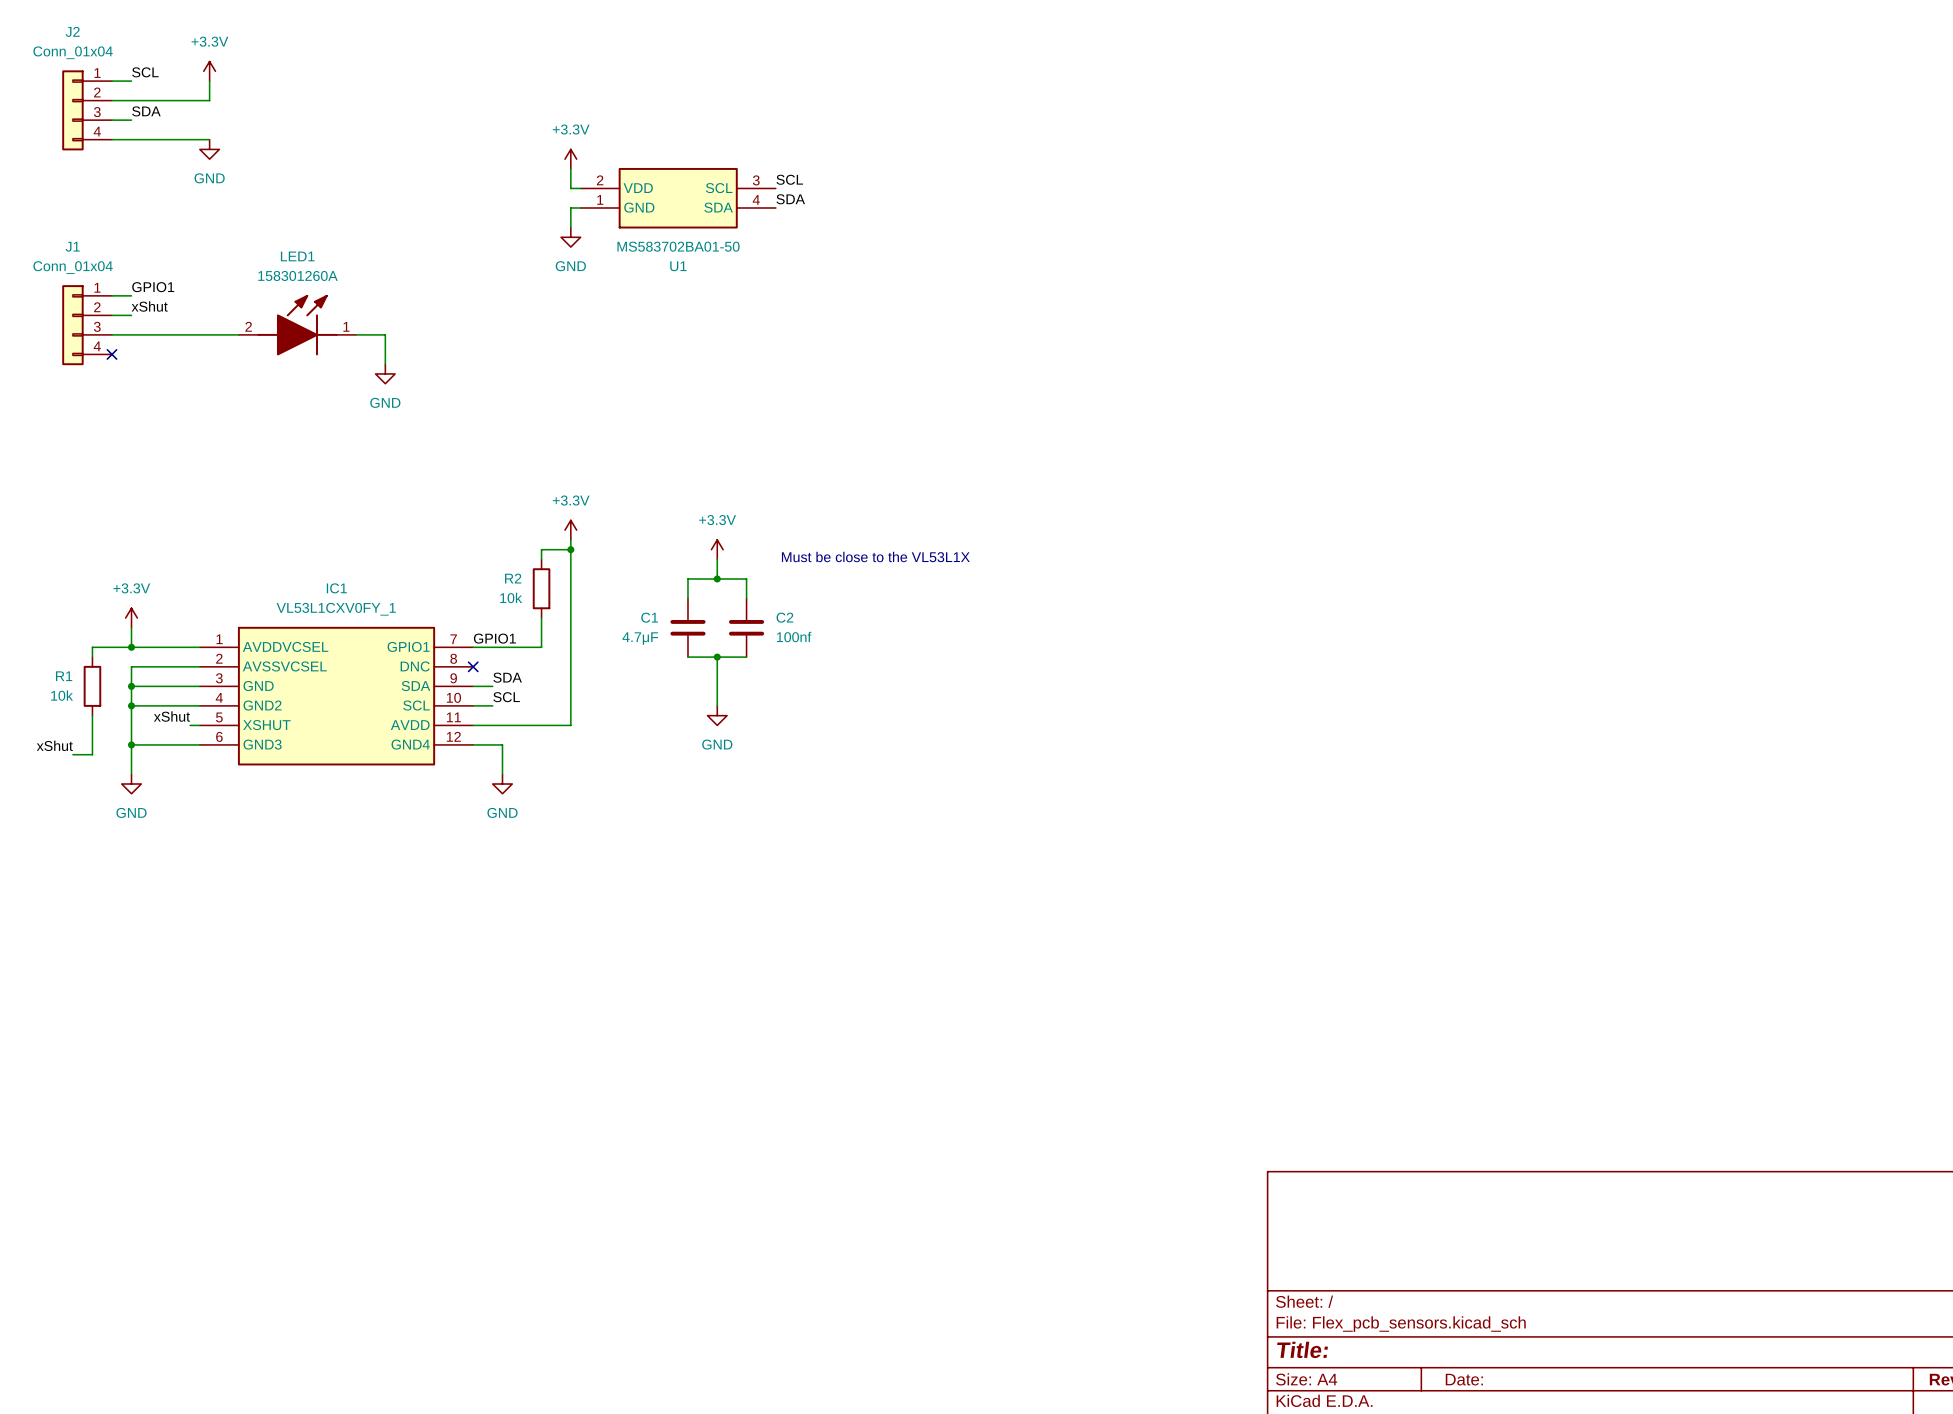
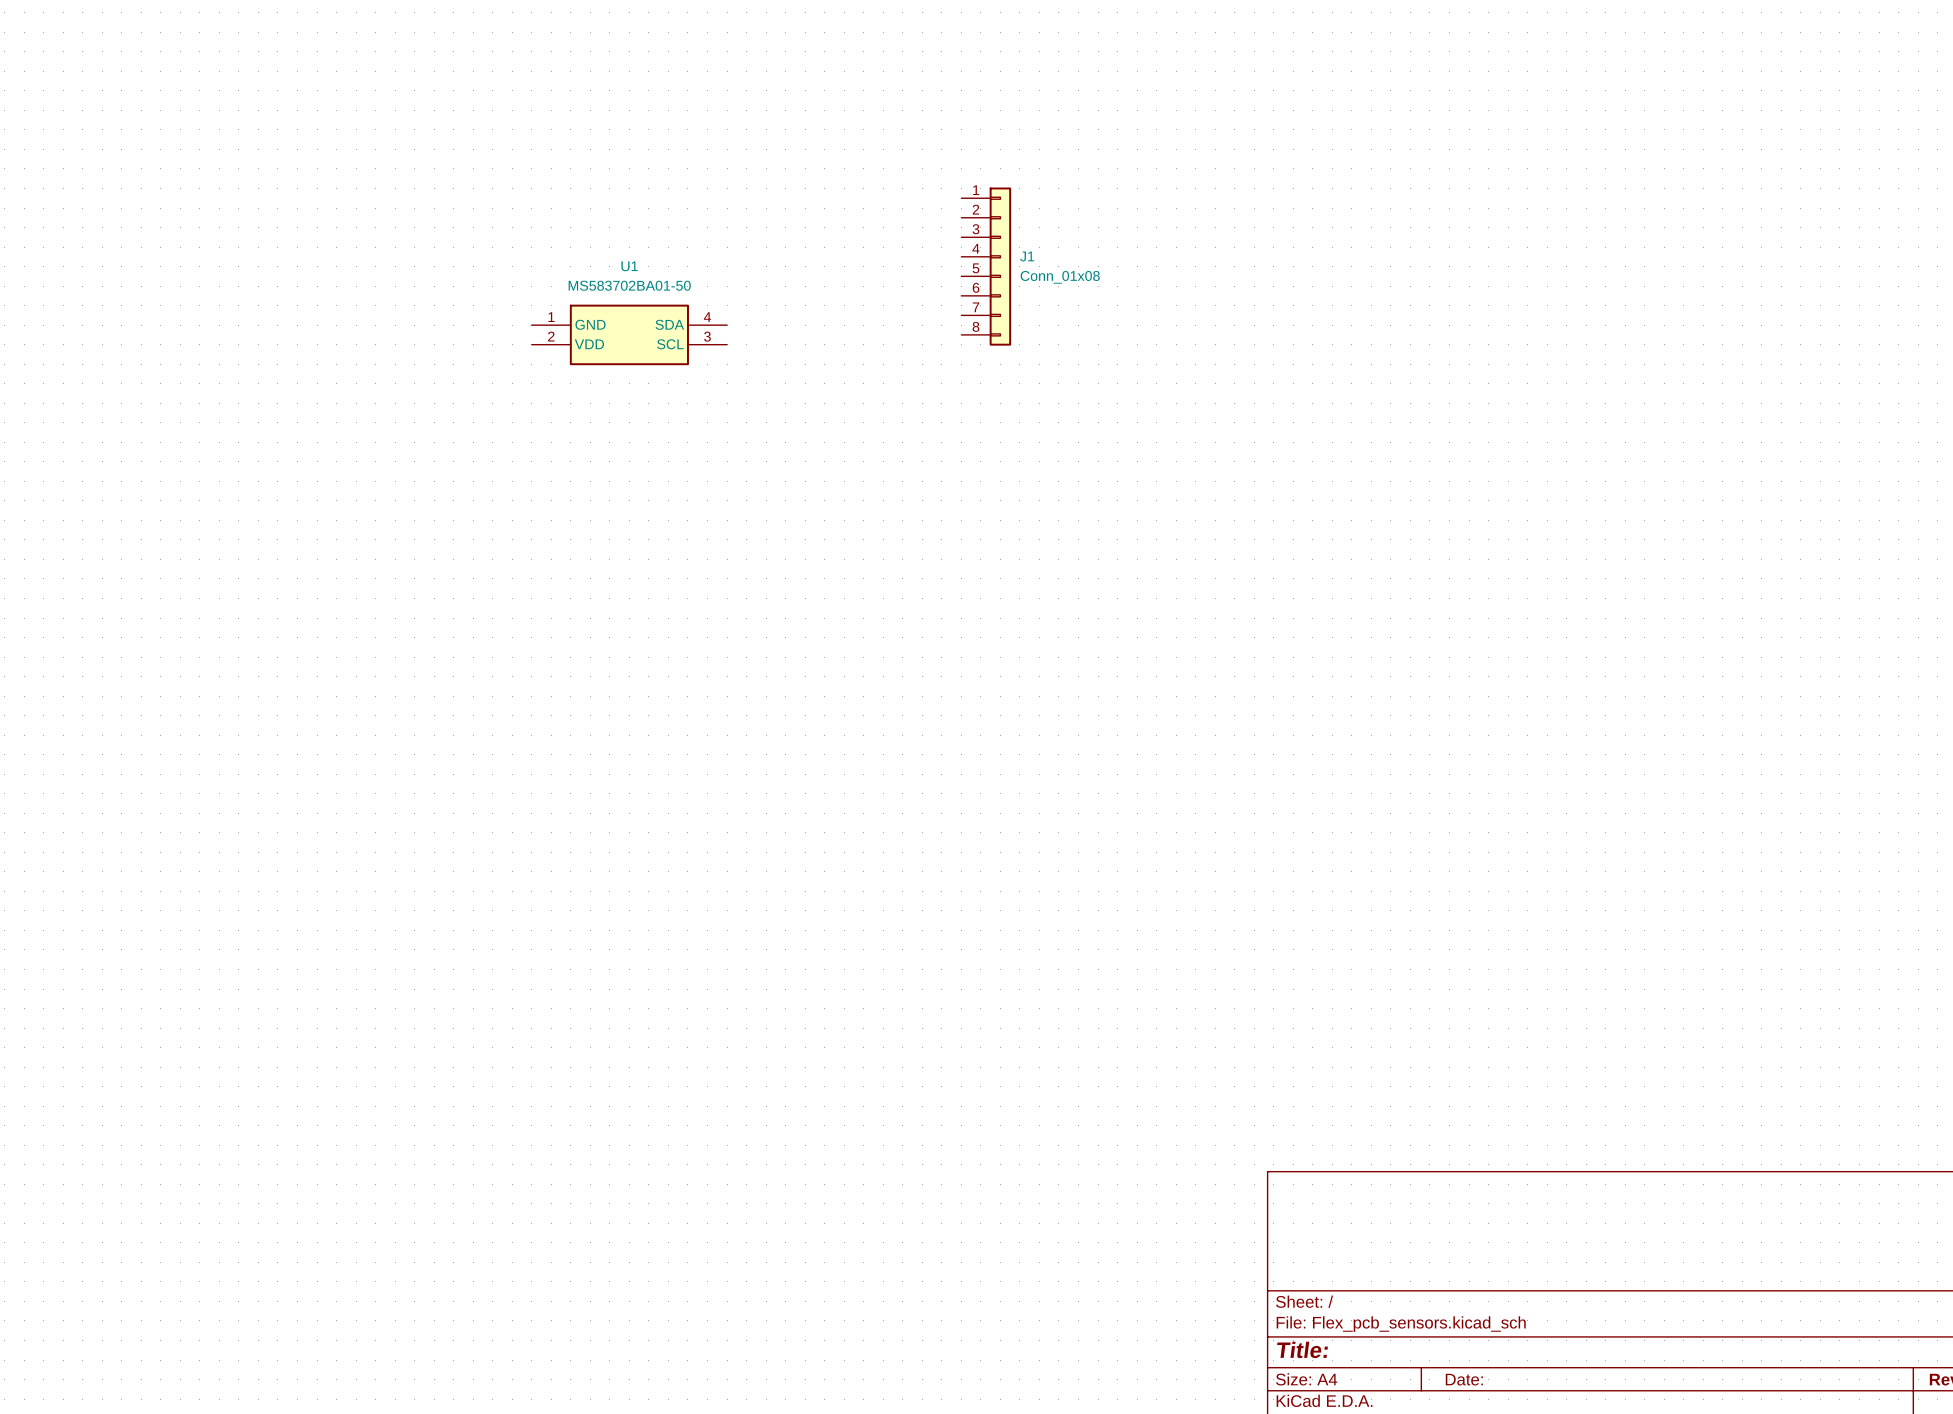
power symbol: +3.3V (209, 71) -> none
label: SCL (145, 72) -> none
wire: (111, 81) (131, 81) -> none
wire: (209, 81) (209, 100) (111, 100) -> none
J2: Conn_01x04 (87, 110) -> none
label: SDA (146, 111) -> none
wire: (111, 120) (131, 120) -> none
wire: (111, 139) (209, 139) -> none
power symbol: GND (209, 149) -> none
power symbol: +3.3V (570, 159) -> none
wire: (570, 168) (570, 188) (580, 188) -> none
label: SCL (789, 179) -> none
U1 flip: as is (678, 198) -> up-down (629, 334)
U1 position: (678, 198) -> (629, 334)
label: SDA (790, 199) -> none
wire: (580, 208) (570, 208) (570, 227) -> none
power symbol: GND (570, 237) -> none
J1 name position: J1 (72, 246) -> J1 (1027, 256)
J1 value: Conn_01x04 (73, 267) -> Conn_01x08 (1060, 277)
J1 symbol: [62, 285, 112, 366] -> [961, 187, 1012, 346]
label: GPIO1 (153, 287) -> none
wire: (111, 295) (131, 295) -> none
label: xShut (149, 306) -> none
wire: (111, 315) (131, 315) -> none
LED1: 158301260A (297, 325) -> none
wire: (111, 334) (238, 334) -> none
wire: (356, 334) (385, 334) (385, 364) -> none
no-connect mark: (111, 354) -> none
power symbol: GND (385, 373) -> none
power symbol: +3.3V (570, 530) -> none
wire: (570, 539) (570, 725) (473, 725) -> none
wire: (570, 549) (541, 549) (541, 559) -> none
junction: (570, 549) -> none
power symbol: +3.3V (717, 549) -> none
text: Must be close to the VL53L1X (875, 556) -> none
wire: (717, 559) (717, 578) -> none
junction: (717, 578) -> none
R2: 10k (541, 588) -> none
wire: (687, 598) (687, 578) (746, 578) (746, 598) -> none
power symbol: +3.3V (131, 618) -> none
wire: (541, 618) (541, 647) (473, 647) -> none
wire: (131, 627) (131, 647) -> none
C1: 4.7μF (687, 627) -> none
C2: 100nf (746, 627) -> none
label: GPIO1 (494, 638) -> none
junction: (131, 647) -> none
wire: (199, 647) (92, 647) (92, 657) -> none
wire: (687, 657) (746, 657) -> none
wire: (717, 657) (717, 705) -> none
junction: (717, 657) -> none
wire: (199, 666) (131, 666) (131, 774) -> none
no-connect mark: (473, 666) -> none
label: SDA (507, 677) -> none
R1: 10k (92, 686) -> none
wire: (131, 686) (199, 686) -> none
junction: (131, 686) -> none
wire: (473, 686) (492, 686) -> none
IC1: VL53L1CXV0FY_1 (336, 696) -> none
label: SCL (506, 697) -> none
wire: (131, 705) (199, 705) -> none
junction: (131, 705) -> none
wire: (473, 705) (492, 705) -> none
wire: (92, 715) (92, 754) (72, 754) -> none
power symbol: GND (717, 715) -> none
label: xShut (171, 716) -> none
wire: (190, 725) (199, 725) -> none
wire: (131, 744) (199, 744) -> none
junction: (131, 744) -> none
wire: (473, 744) (502, 744) (502, 774) -> none
label: xShut (54, 745) -> none
power symbol: GND (131, 784) -> none
power symbol: GND (502, 784) -> none

